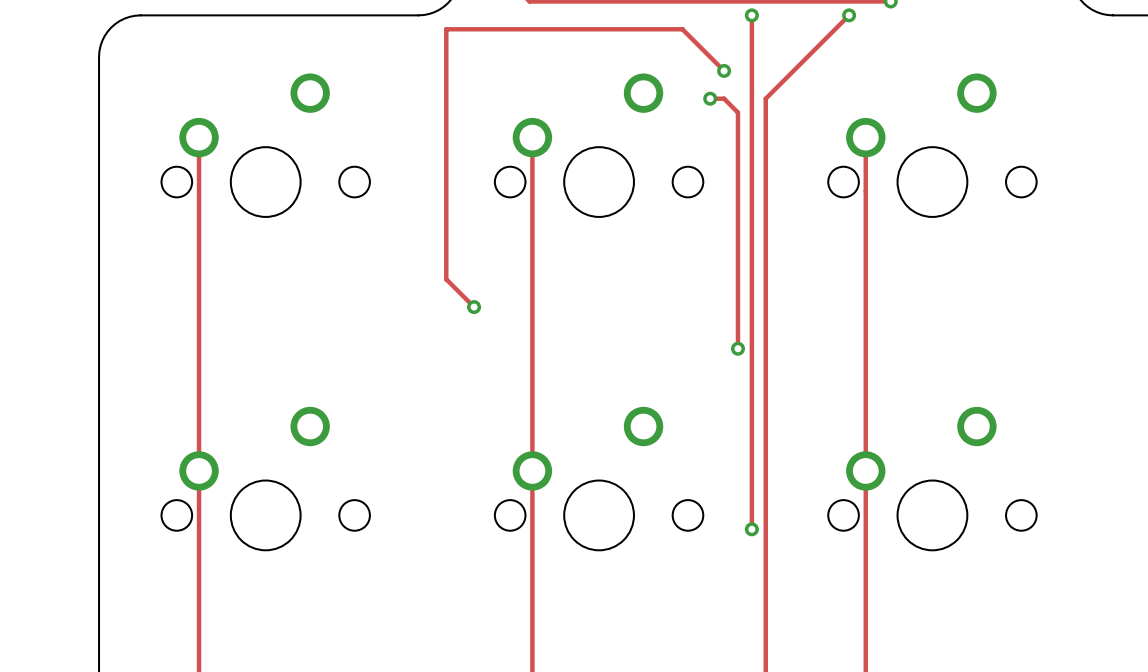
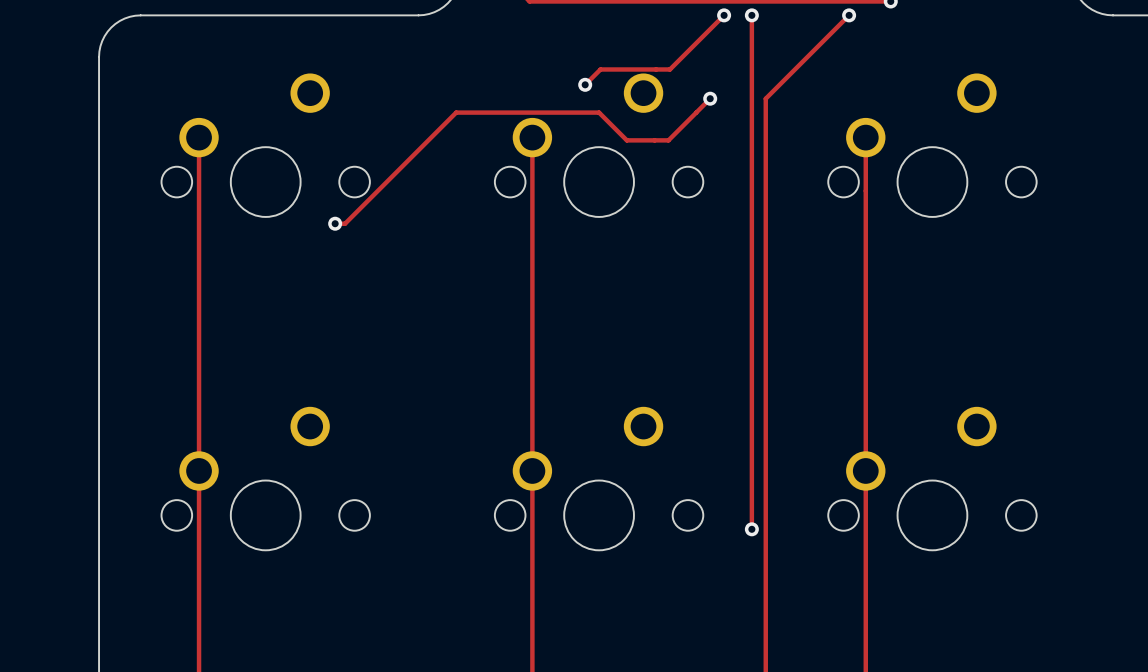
track: none -> (724, 15) (669, 69) (600, 69) (585, 84)
track: (724, 70) (682, 29) (446, 29) (446, 279) (474, 307) -> none
via position: (724, 70) -> (724, 15)
via: none -> (585, 84)
track: (710, 98) (724, 98) (737, 112) (737, 348) -> (710, 98) (668, 140) (626, 140) (599, 112) (456, 112) (345, 223) (335, 223)
via: none -> (335, 223)
via: (474, 307) -> none
via: (737, 348) -> none

